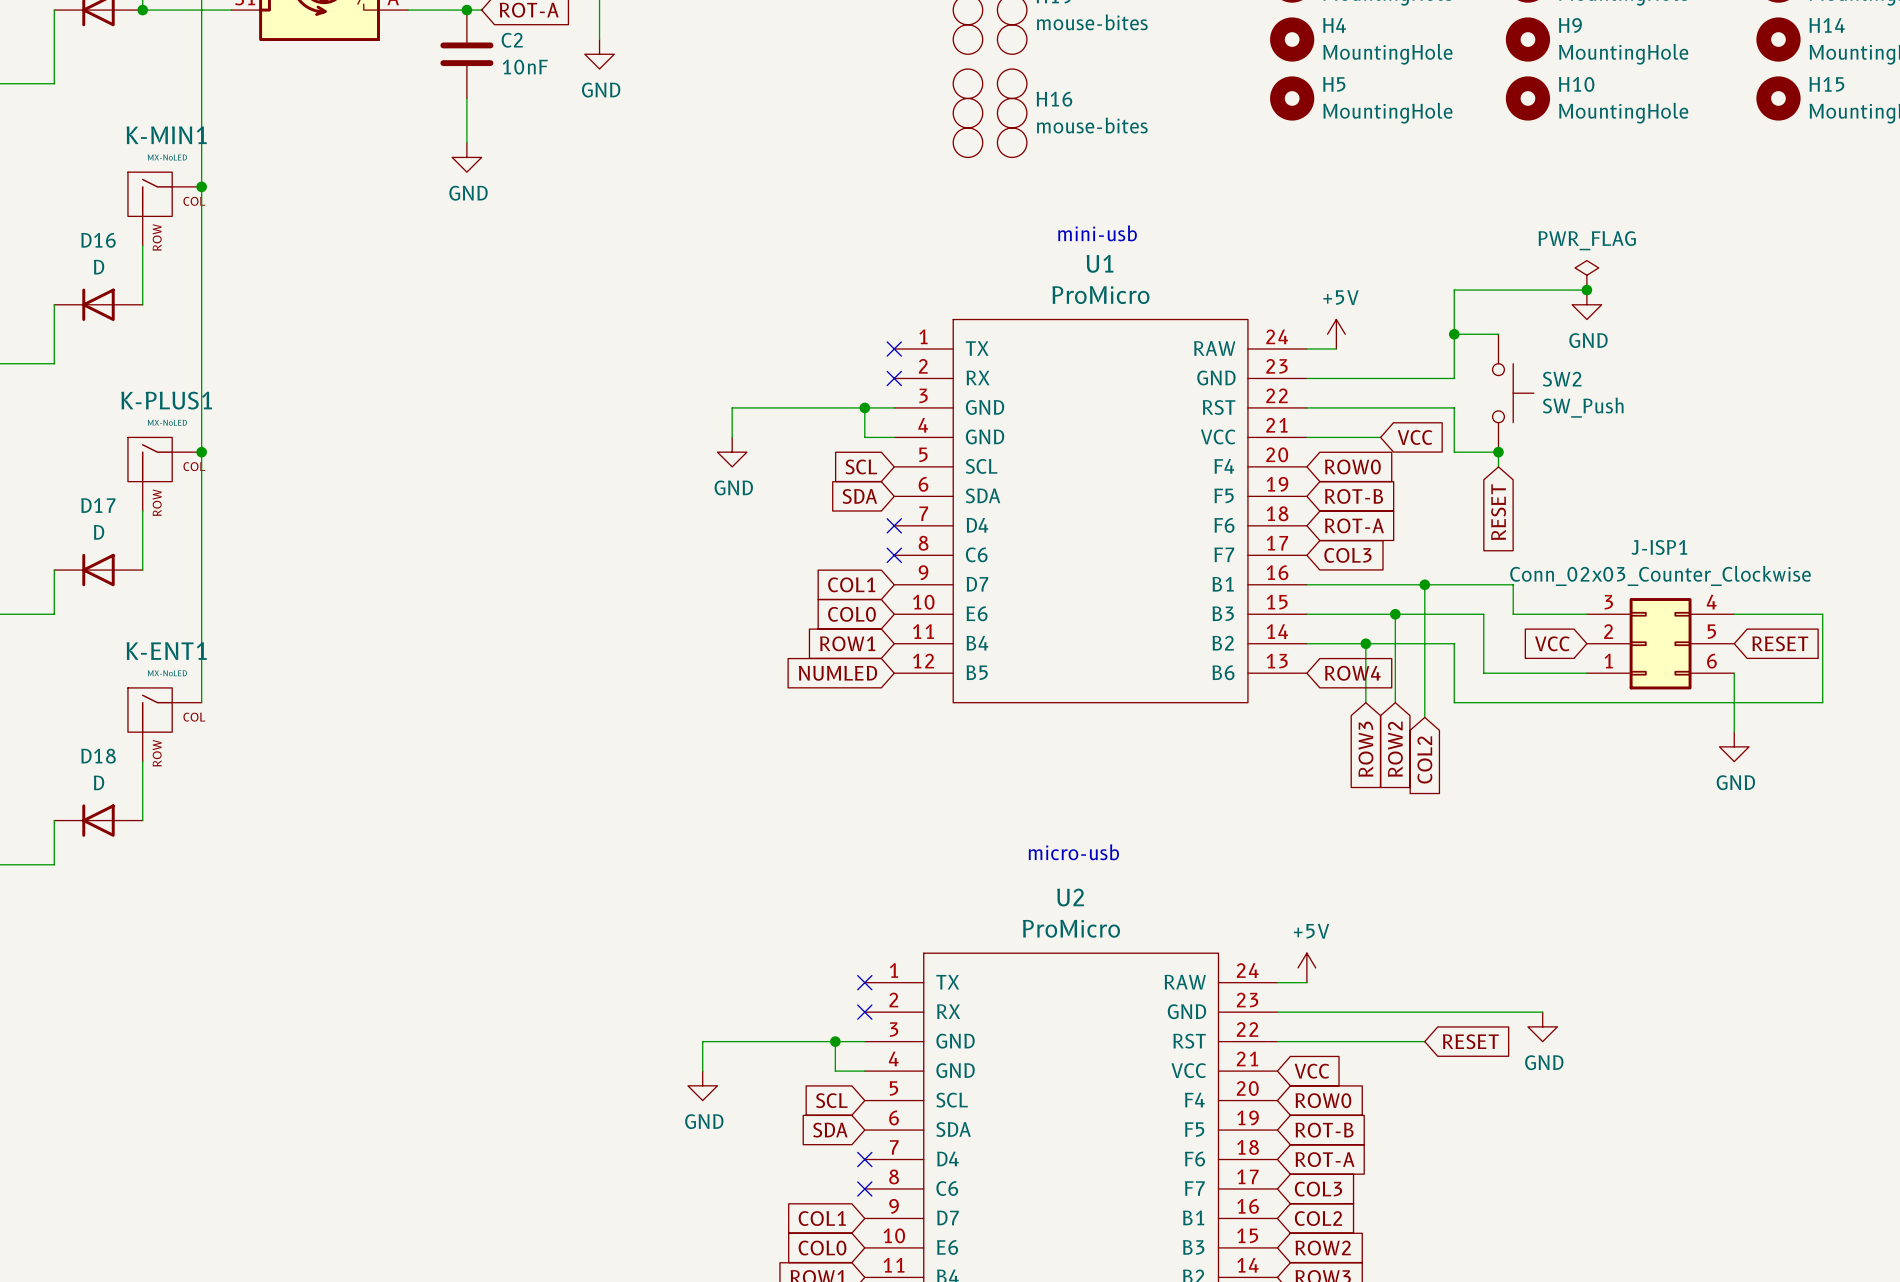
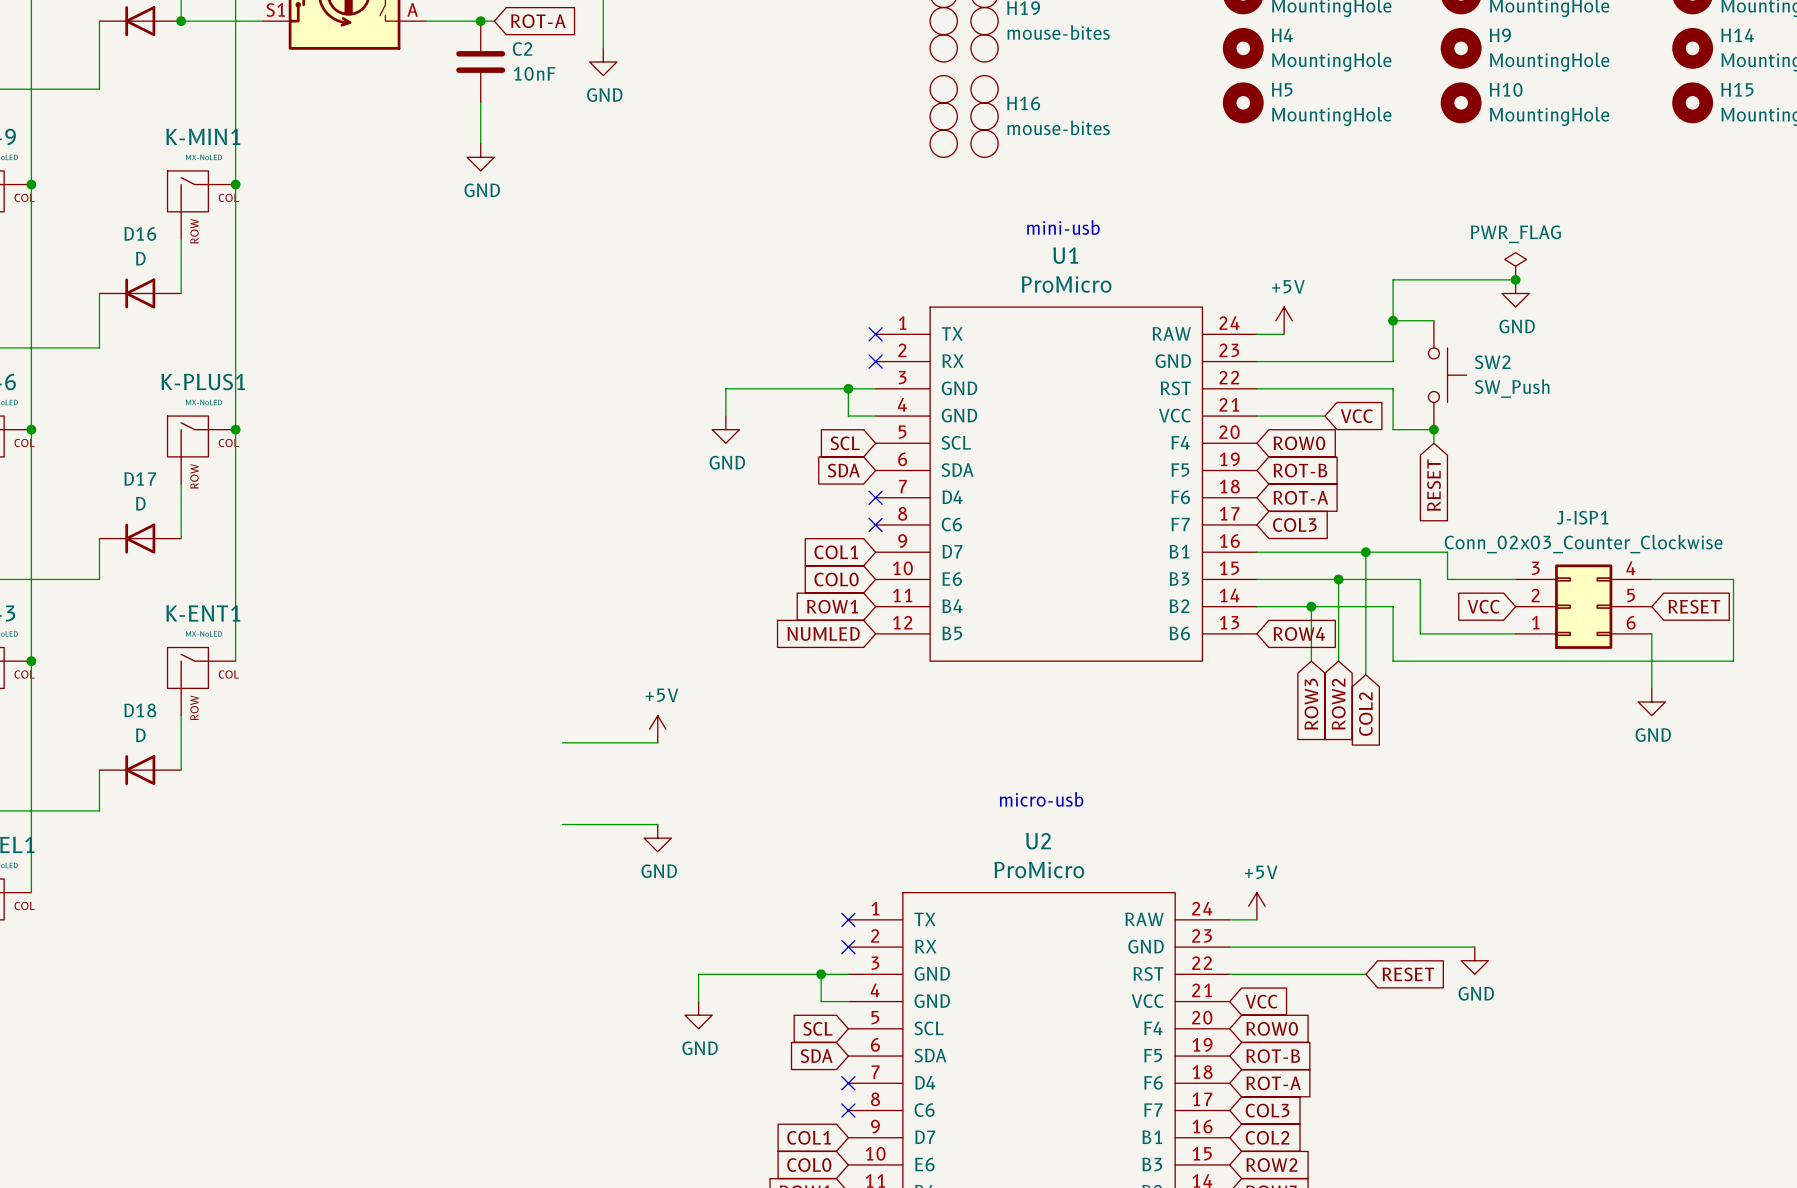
power symbol: none -> +5V (657, 729)
wire: none -> (562, 742) (657, 742)
wire: none -> (562, 824) (657, 824)
power symbol: none -> GND (657, 838)

